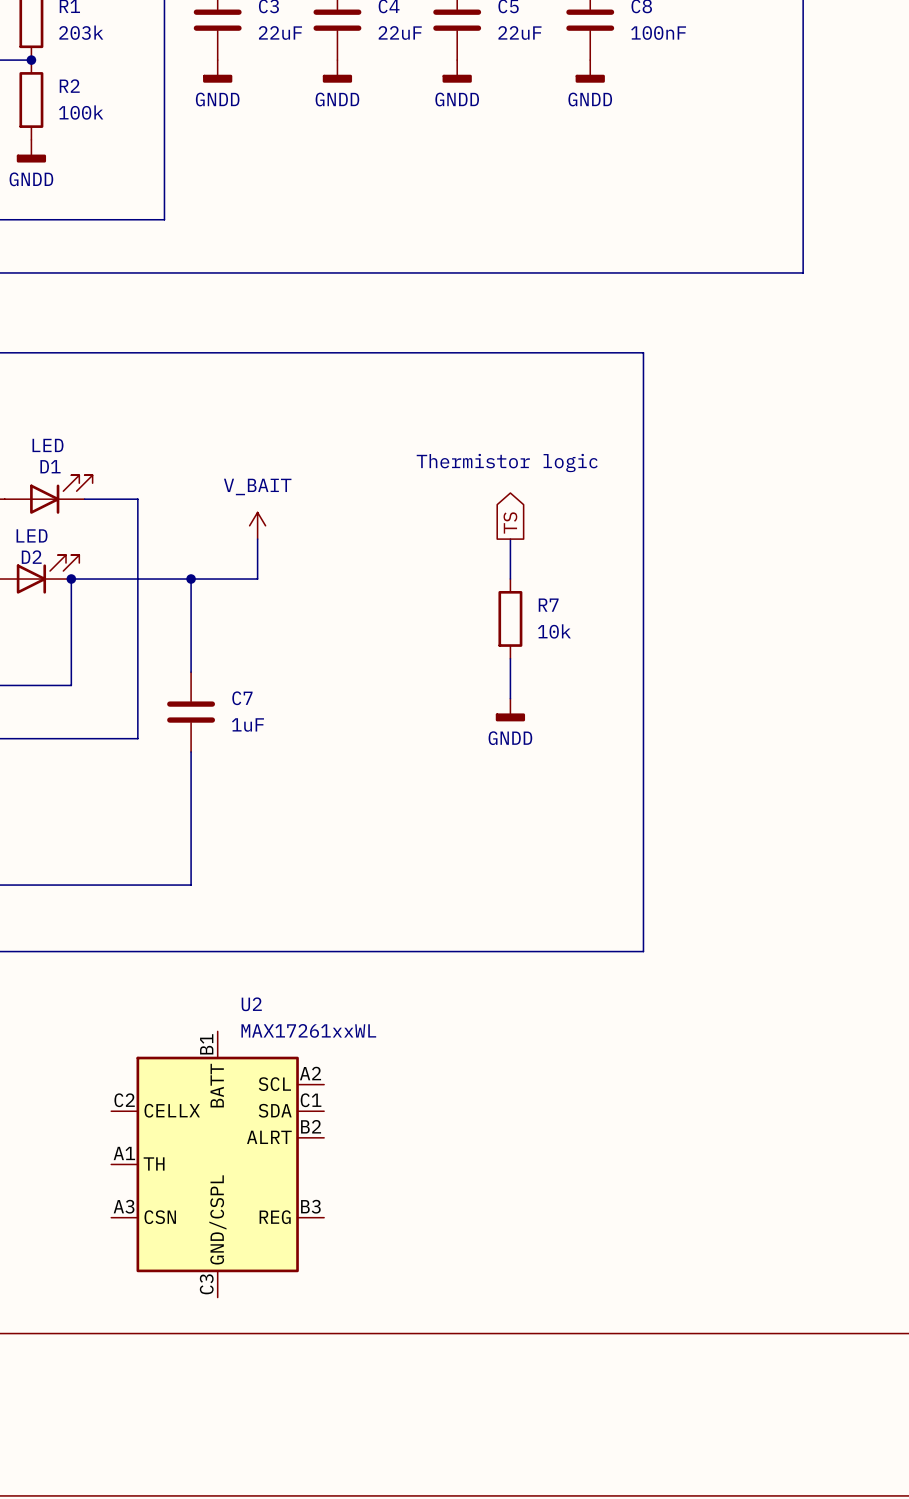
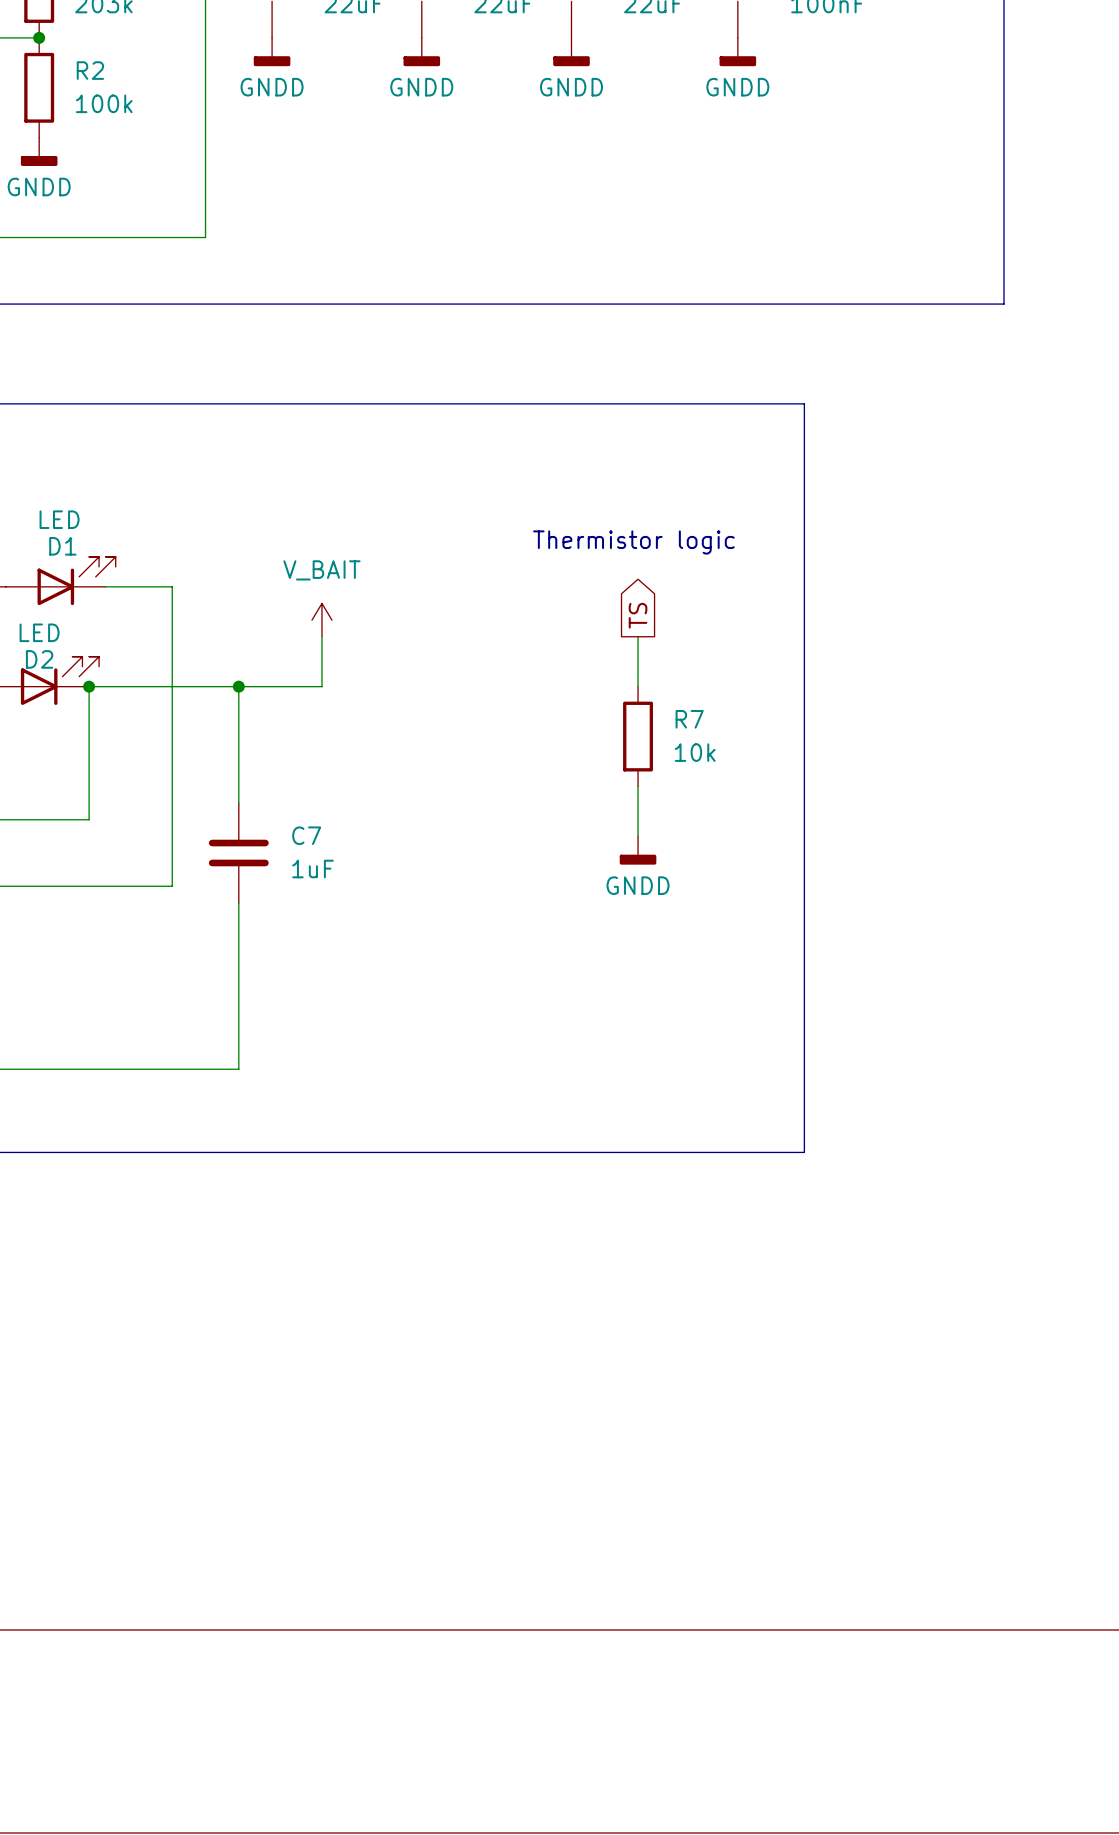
U2: MAX17261xxWL (217, 1164) -> none

